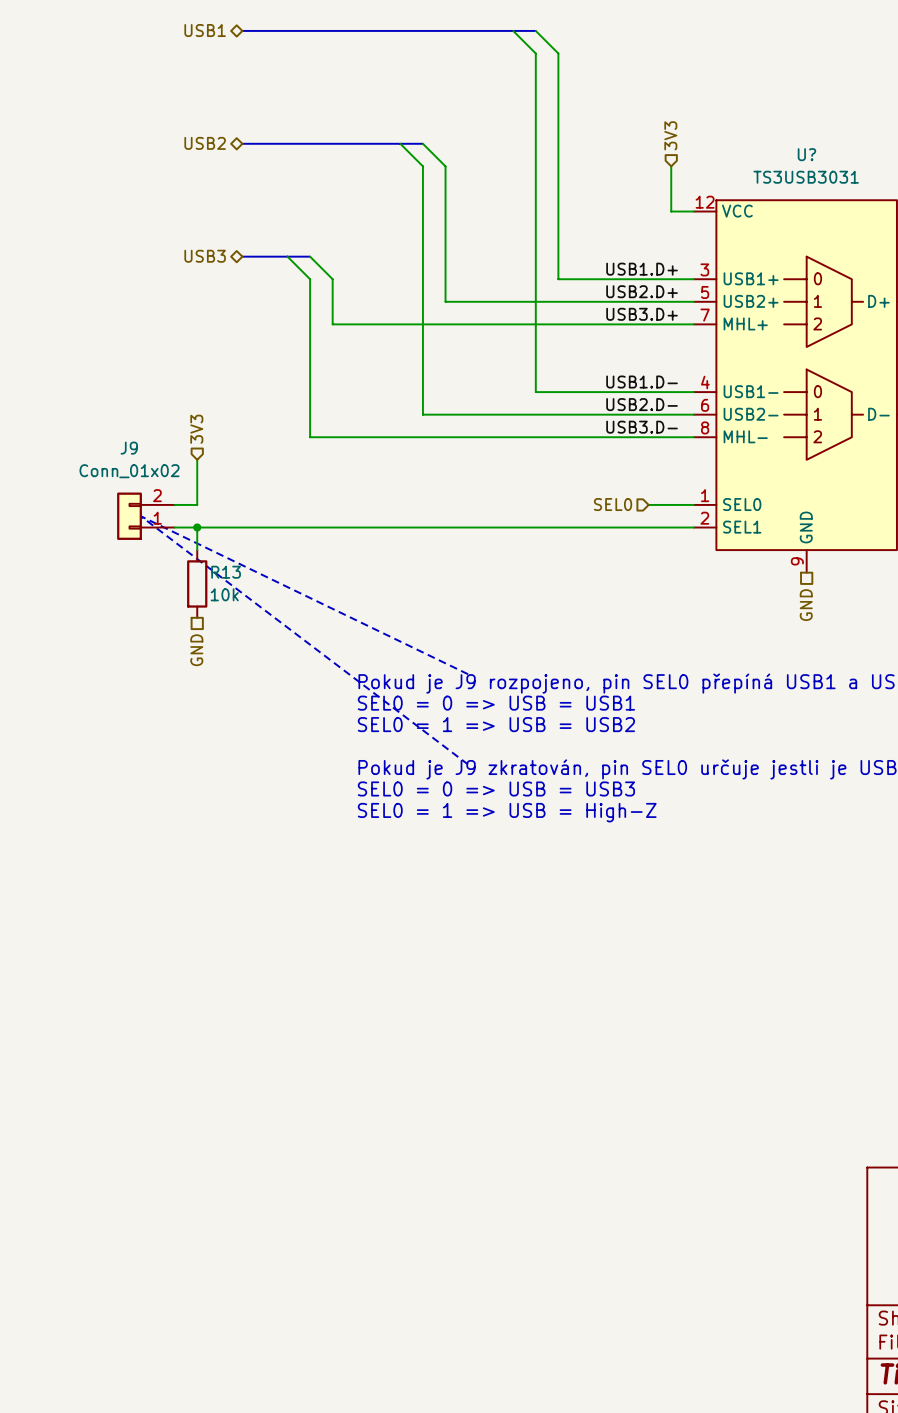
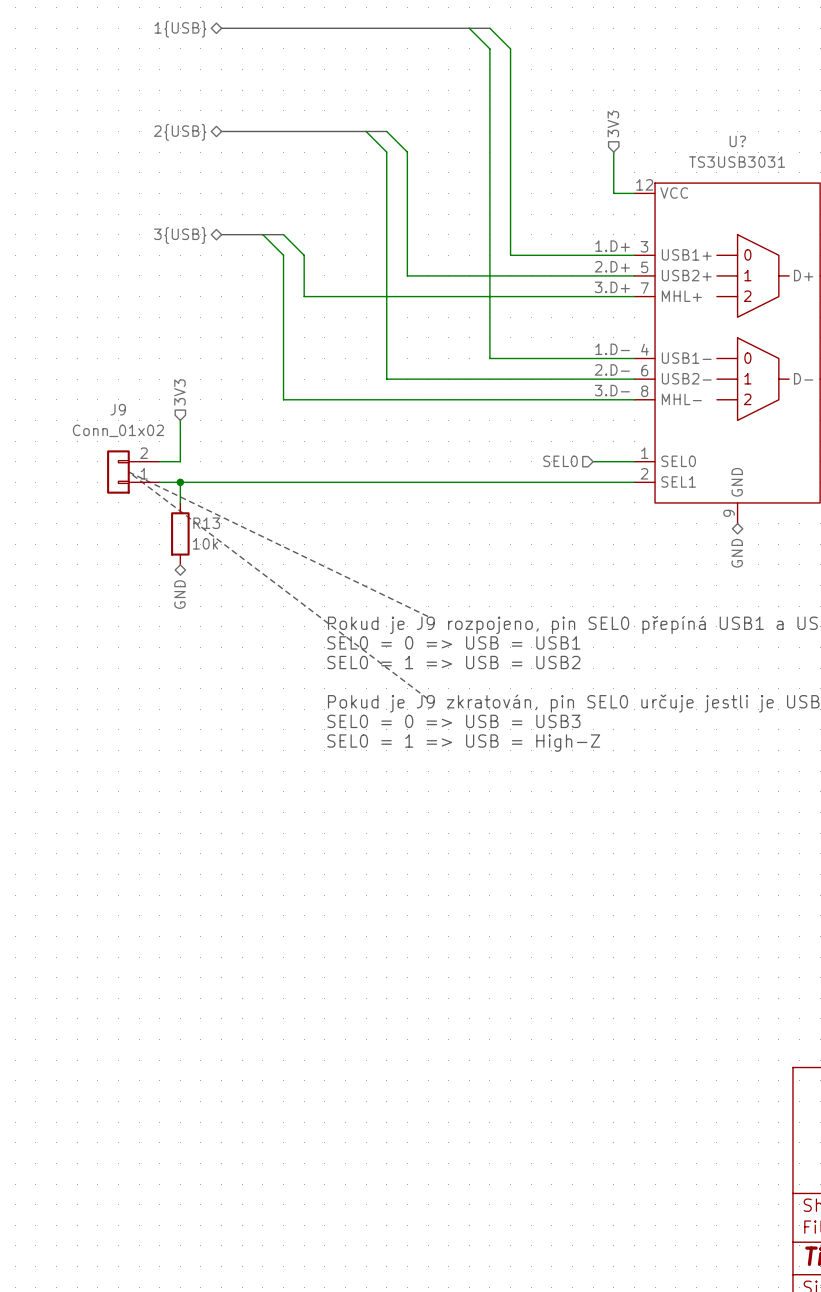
hierarchical label: USB1 (205, 30) -> 1{USB} (180, 29)
hierarchical label: USB2 (205, 143) -> 2{USB} (180, 132)
hierarchical label: USB3 (205, 256) -> 3{USB} (180, 235)
label: USB1.D+ (642, 269) -> 1.D+ (612, 246)
label: USB2.D+ (642, 291) -> 2.D+ (612, 266)
label: USB3.D+ (642, 314) -> 3.D+ (612, 287)
label: USB1.D- (642, 382) -> 1.D- (612, 349)
label: USB2.D- (642, 404) -> 2.D- (612, 369)
label: USB3.D- (642, 427) -> 3.D- (612, 390)
hierarchical label shape: passive (806, 605) -> bidirectional (737, 553)
hierarchical label shape: passive (196, 650) -> bidirectional (179, 594)

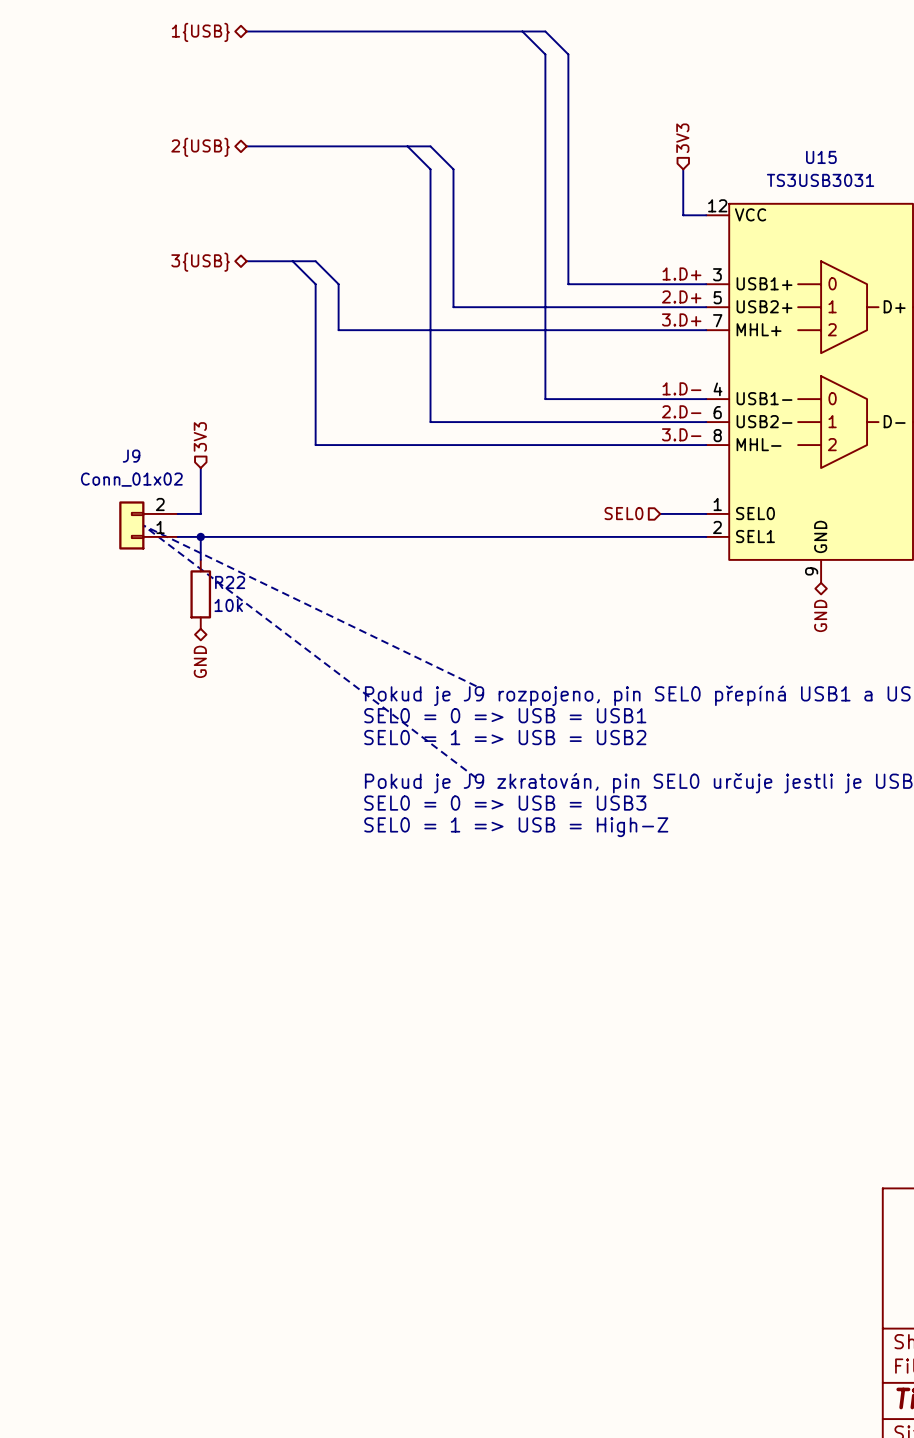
U? name: U? (737, 141) -> U15 (821, 157)
R13 name: R13 (206, 523) -> R22 (230, 582)

